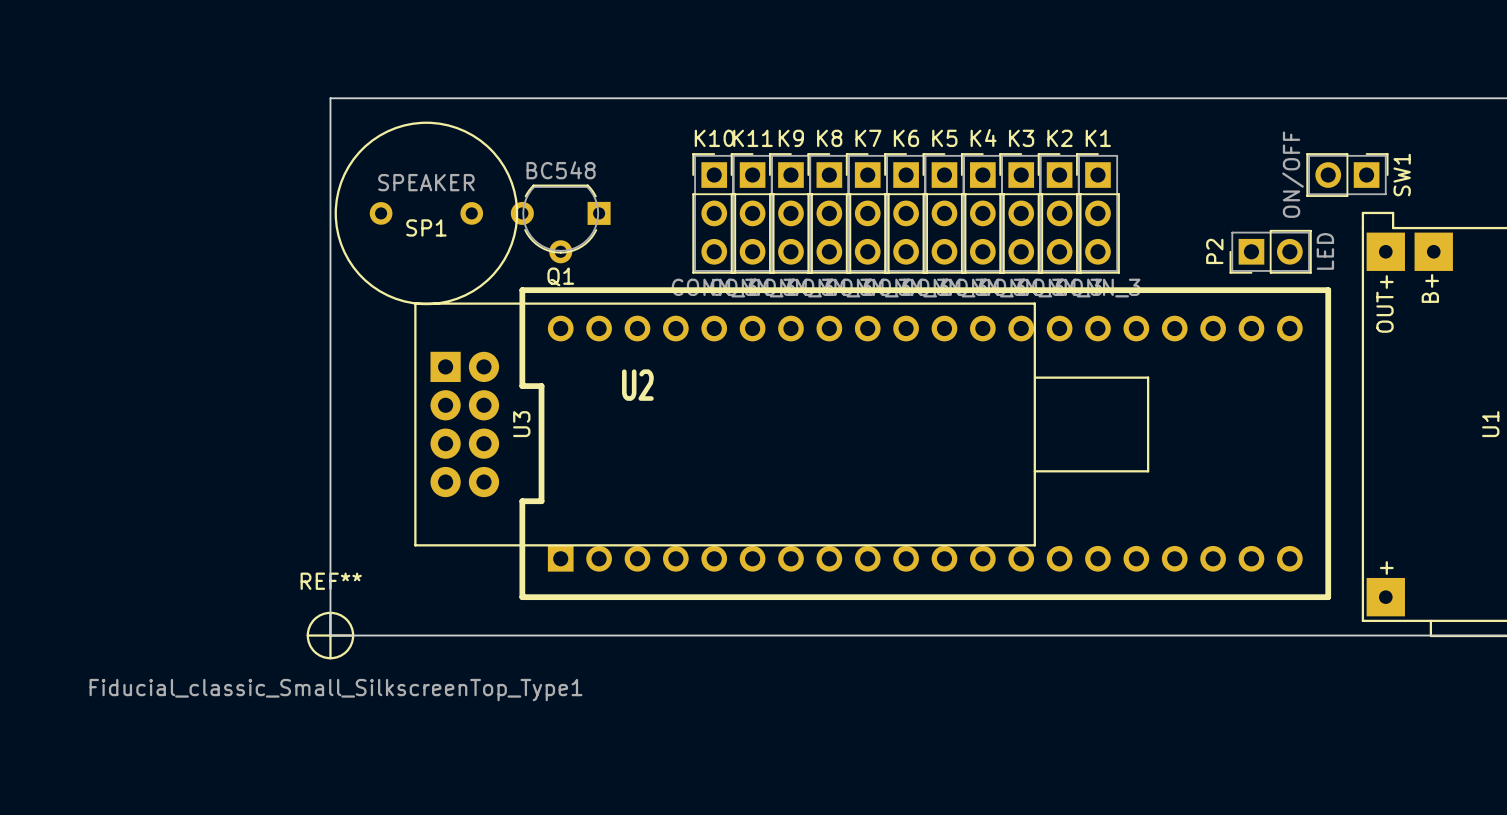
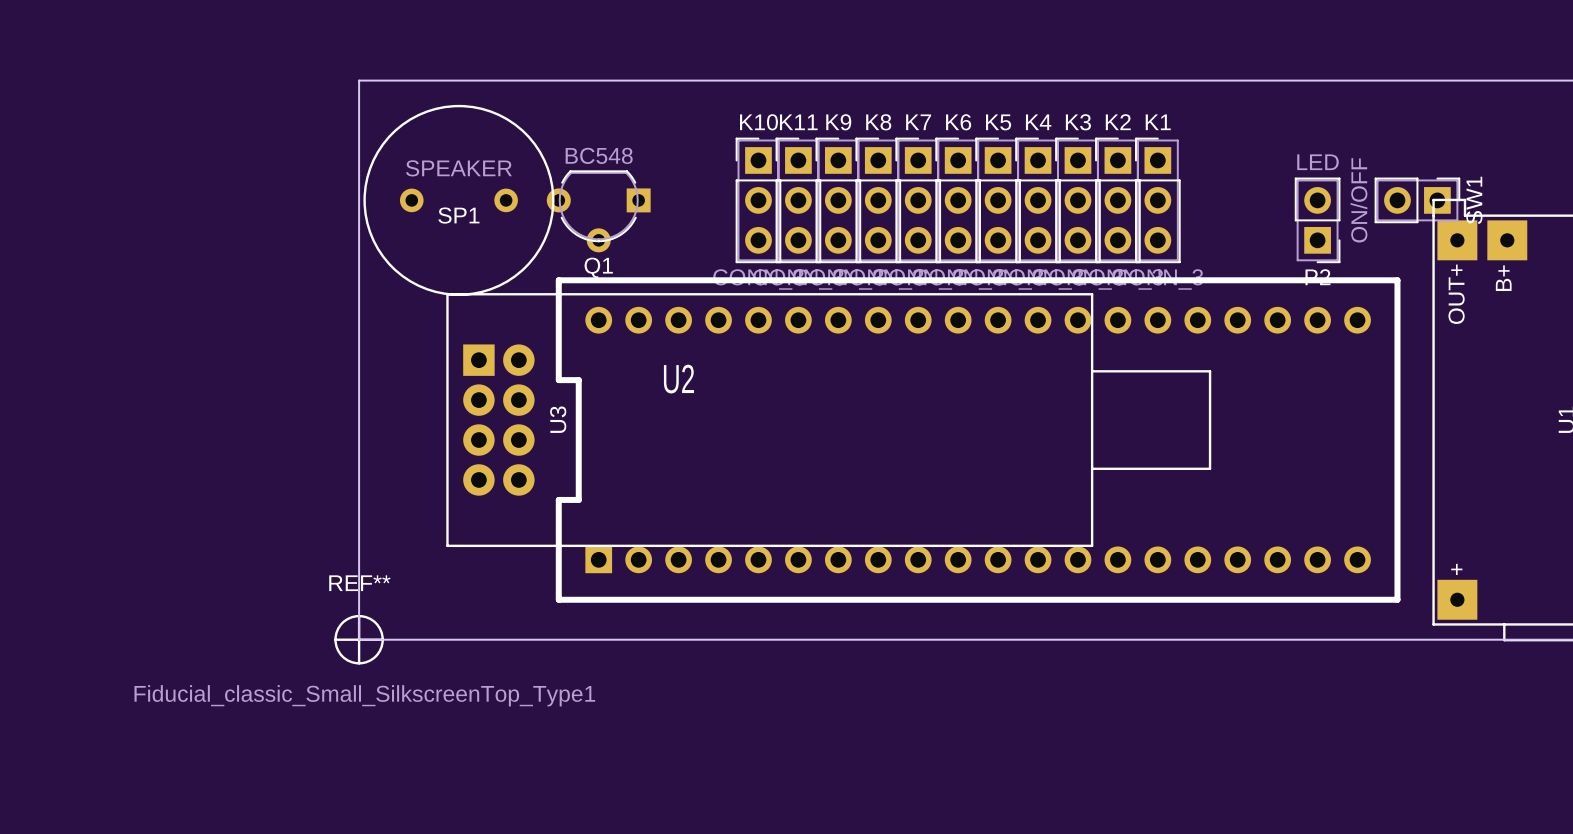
SW1 position: (1347, 175) -> (1417, 200)
P2 rotation: 0° (1270, 251) -> 90° counterclockwise (1317, 220)

